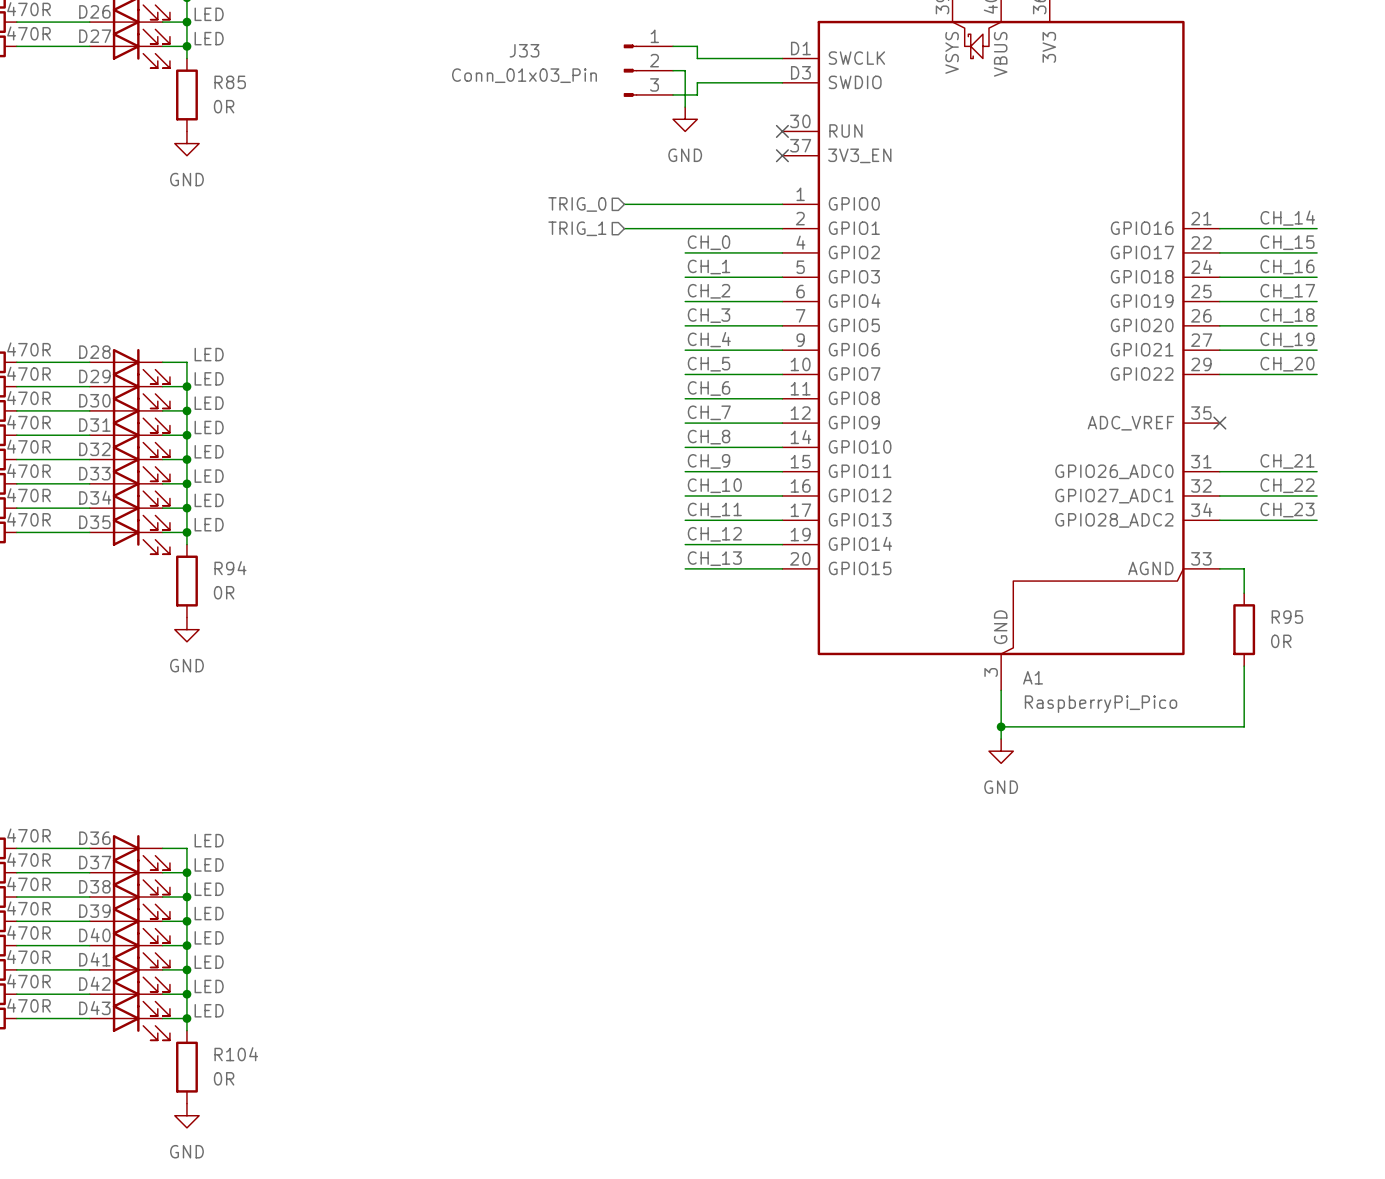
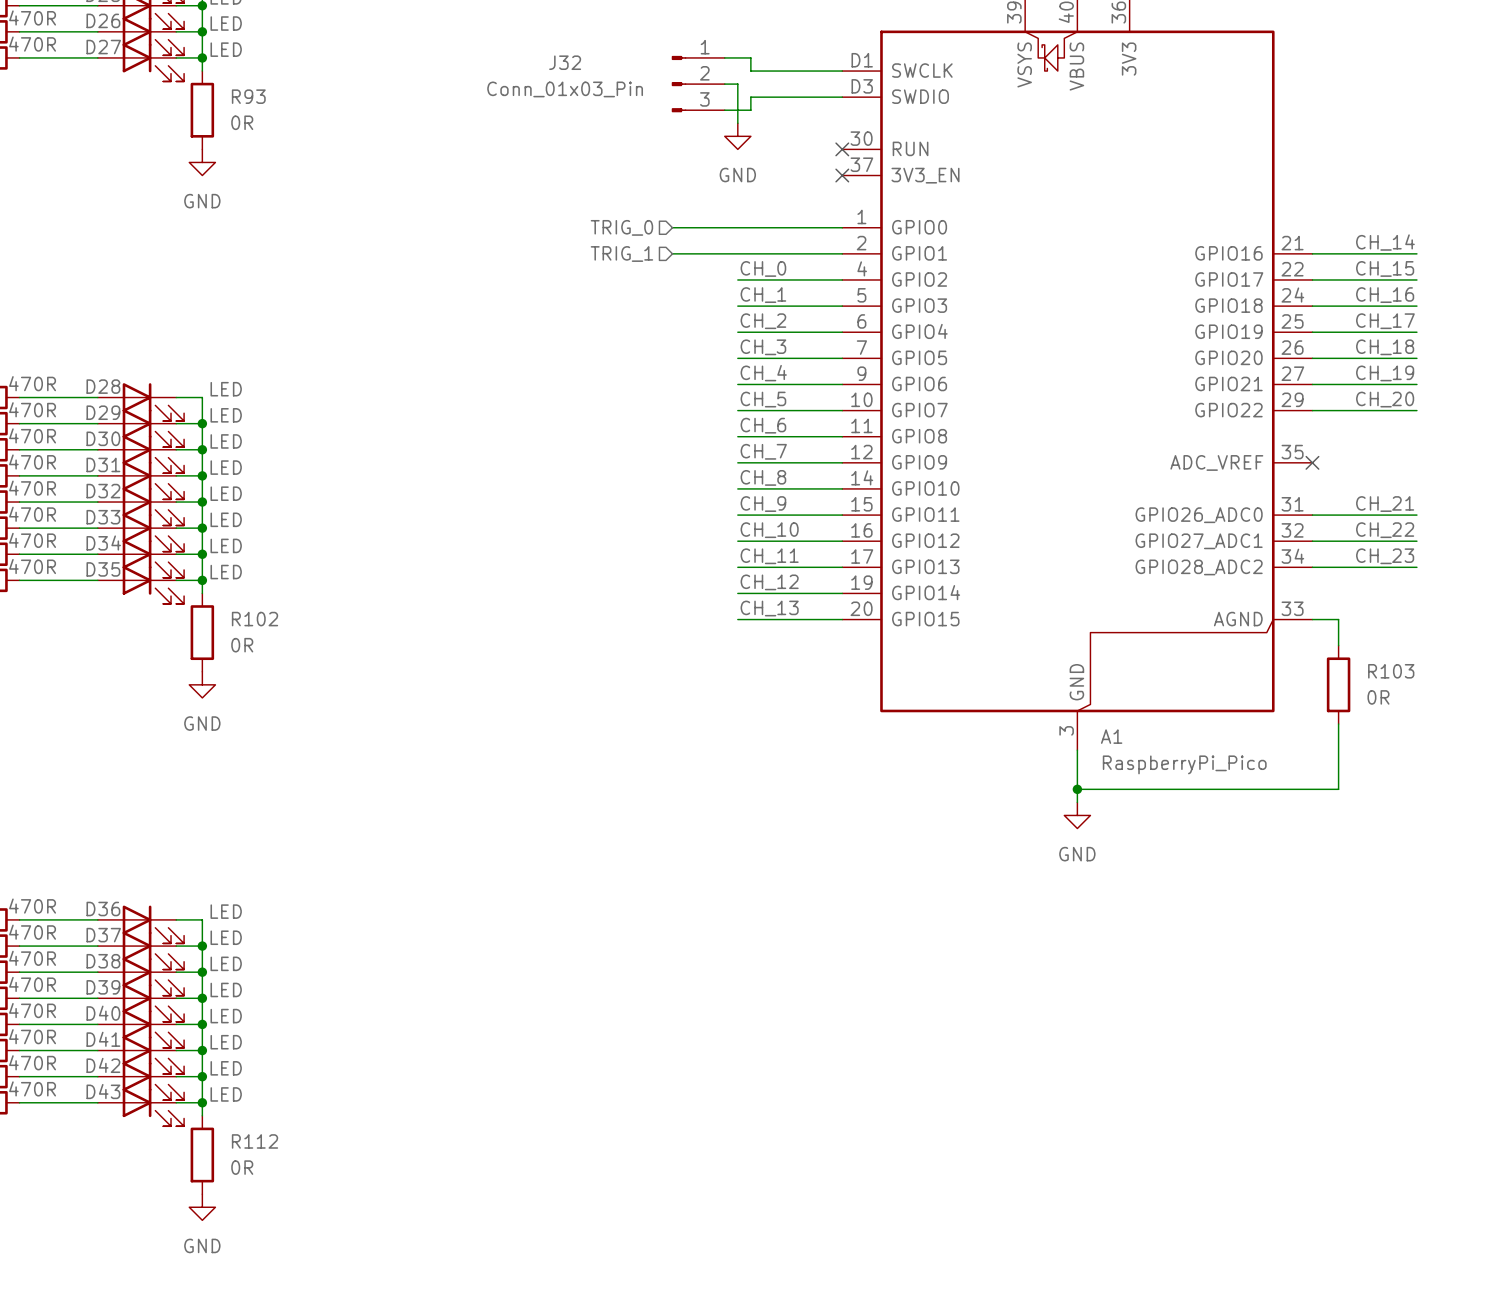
J33 name: J33 (524, 50) -> J32 (565, 62)
R85 name: R85 (230, 82) -> R93 (248, 96)
R94 name: R94 (230, 568) -> R102 (255, 619)
R95 name: R95 (1287, 617) -> R103 (1391, 671)
R104 name: R104 (236, 1054) -> R112 (255, 1141)

